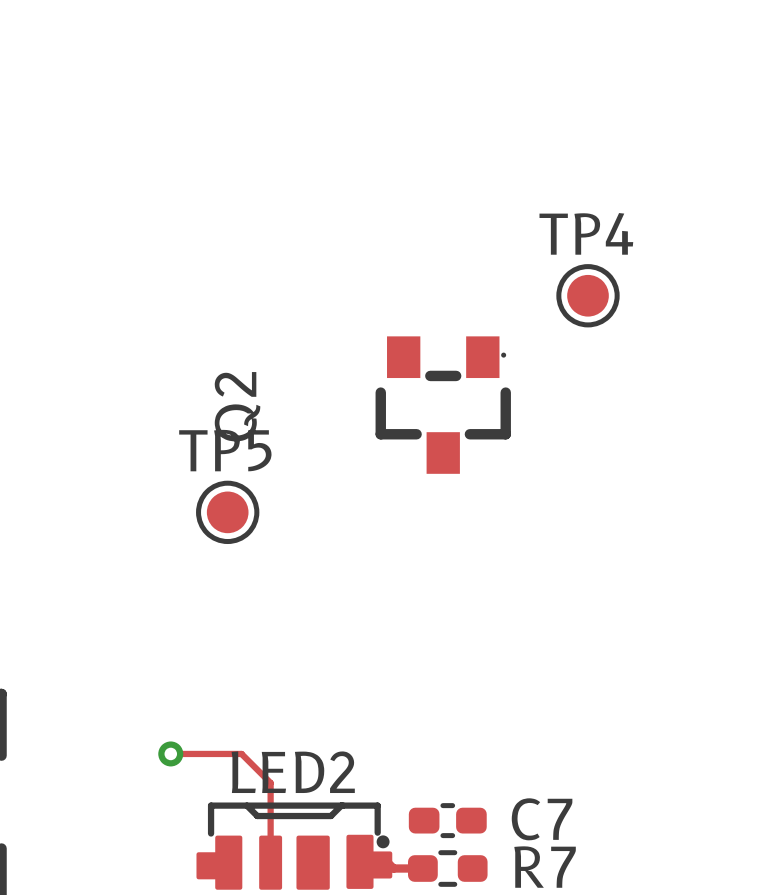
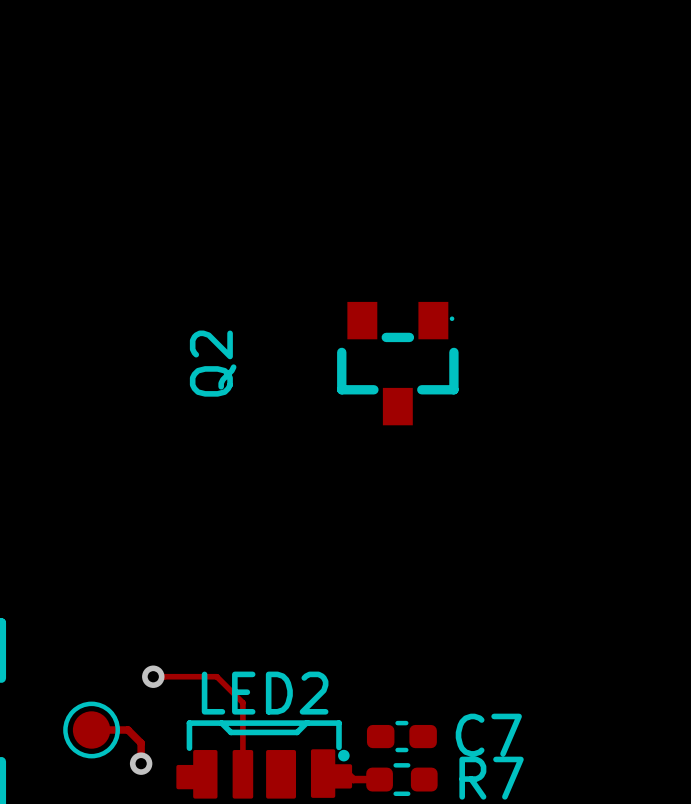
TP4: (588, 295) -> none
TP5: (227, 512) -> none
track: none -> (91, 730) (128, 730) (141, 743) (141, 763)
part: none -> (91, 730)
via: none -> (141, 763)

